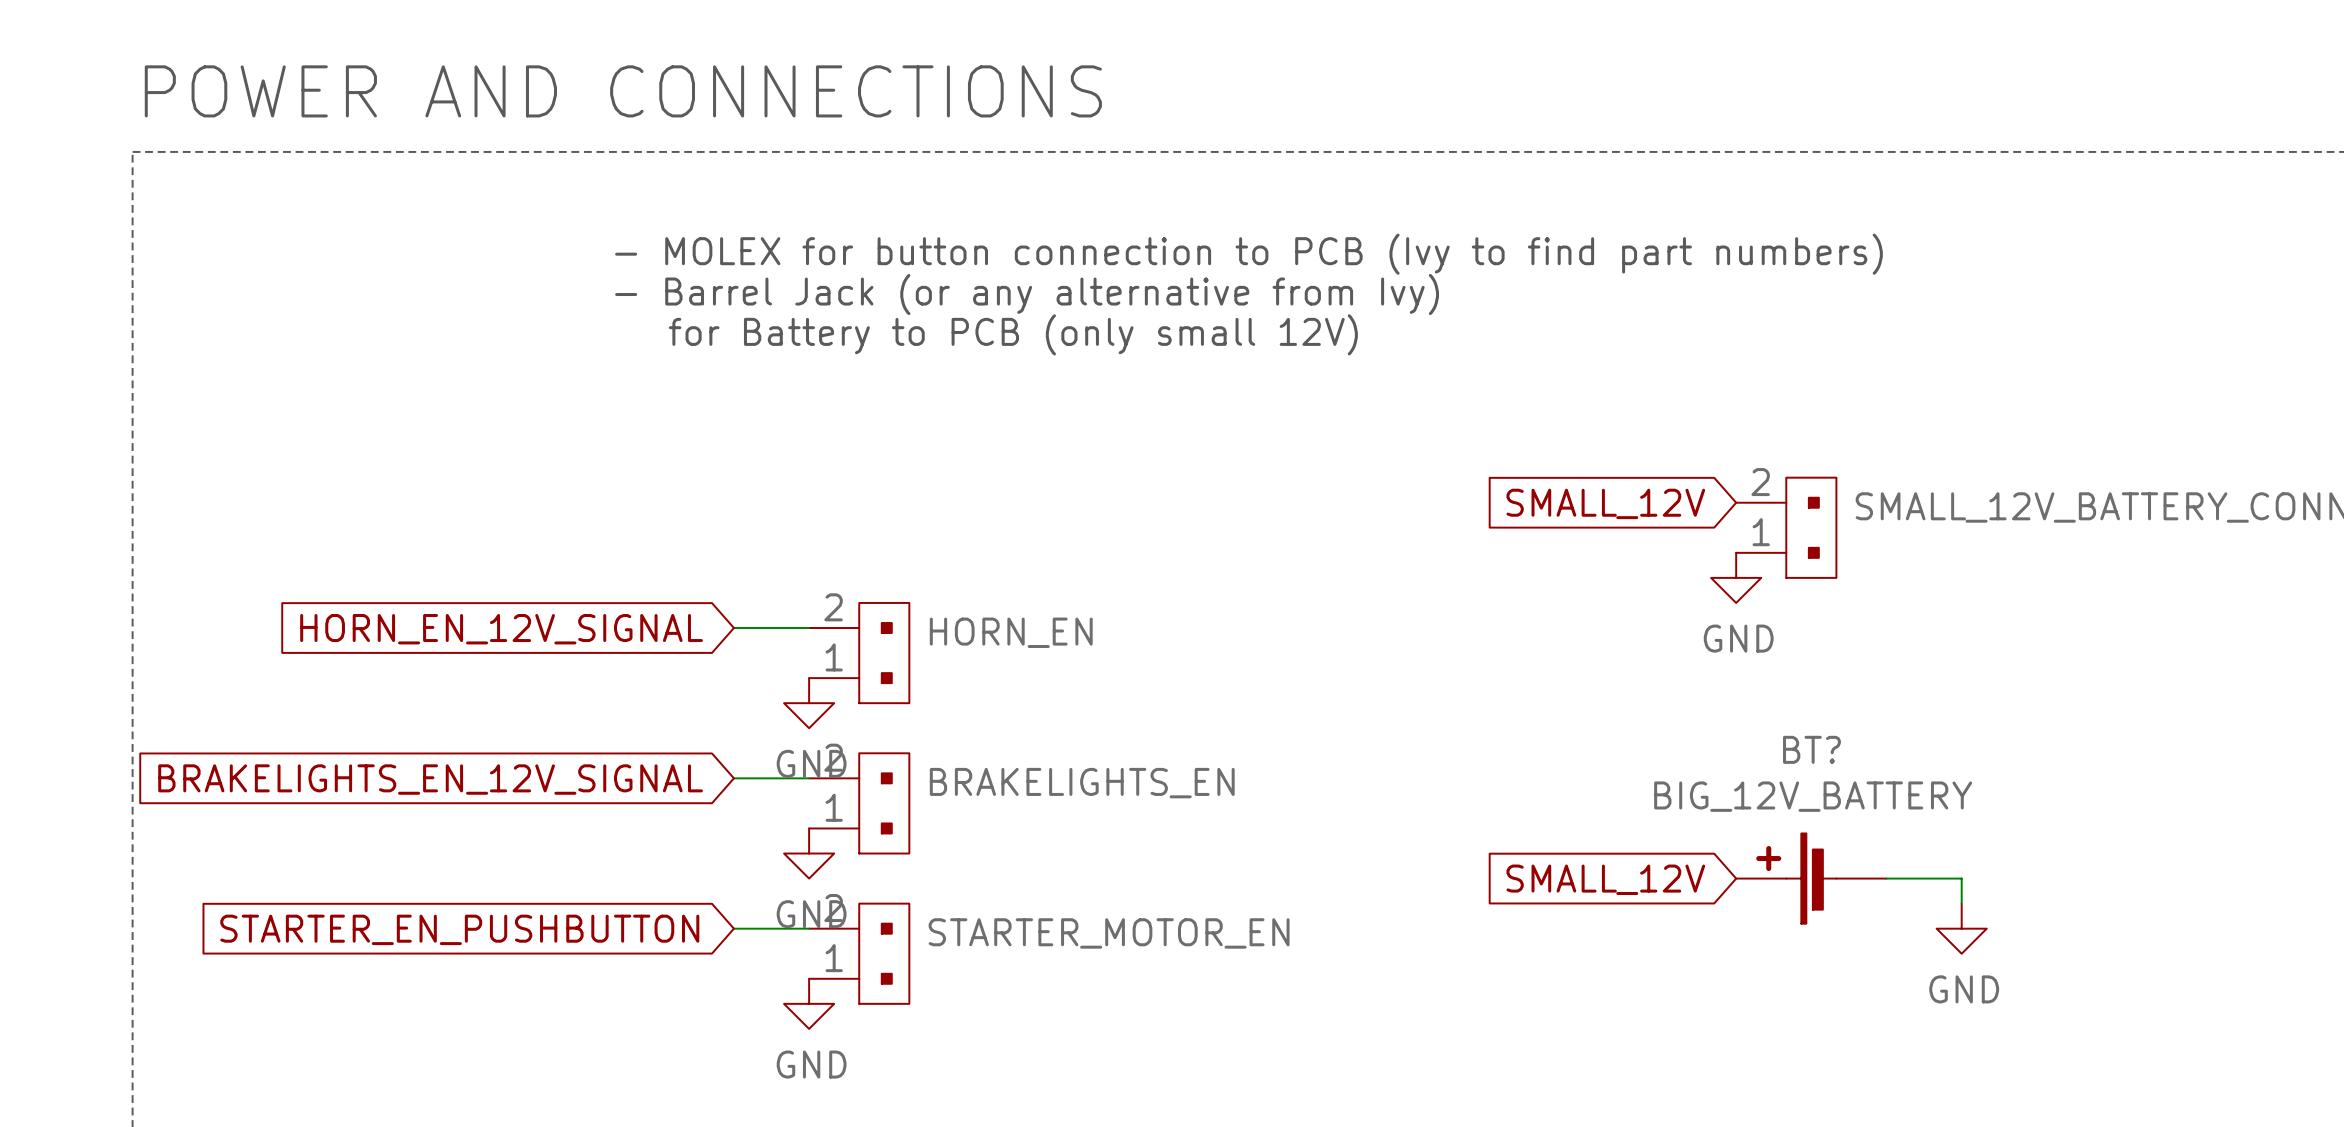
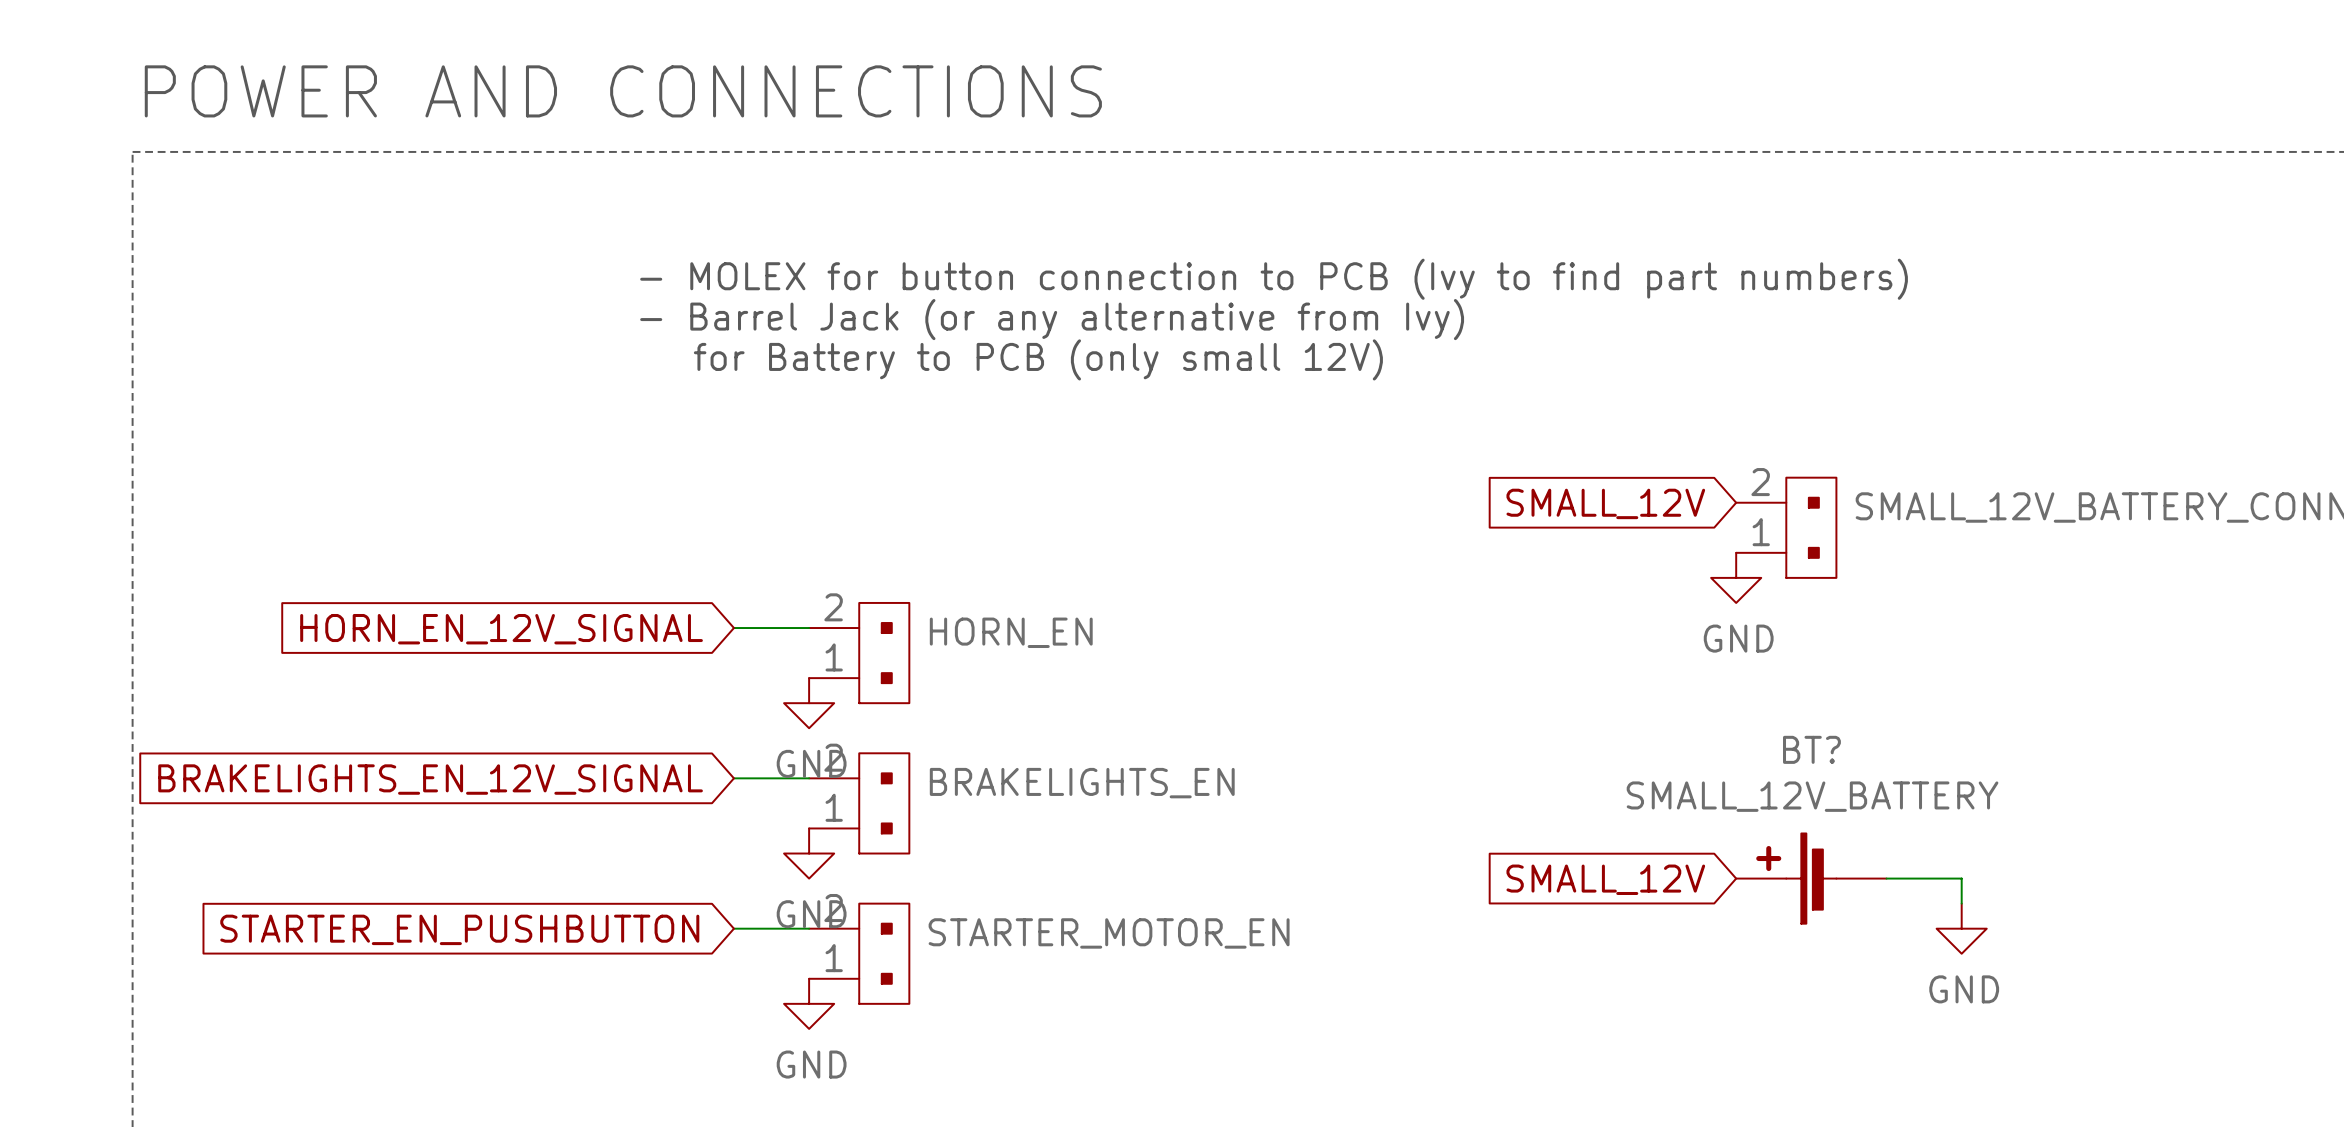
text position: - MOLEX for button connection to PCB (Ivy to find part numbers) (1248, 254) -> - MOLEX for button connection to PCB (Ivy to find part numbers) (1274, 279)
text position: - Barrel Jack (or any alternative from Ivy) (1027, 294) -> - Barrel Jack (or any alternative from Ivy) (1052, 319)
text position: for Battery to PCB (only small 12V) (1013, 334) -> for Battery to PCB (only small 12V) (1038, 359)
BT? value: BIG_12V_BATTERY (1813, 796) -> SMALL_12V_BATTERY (1812, 796)

